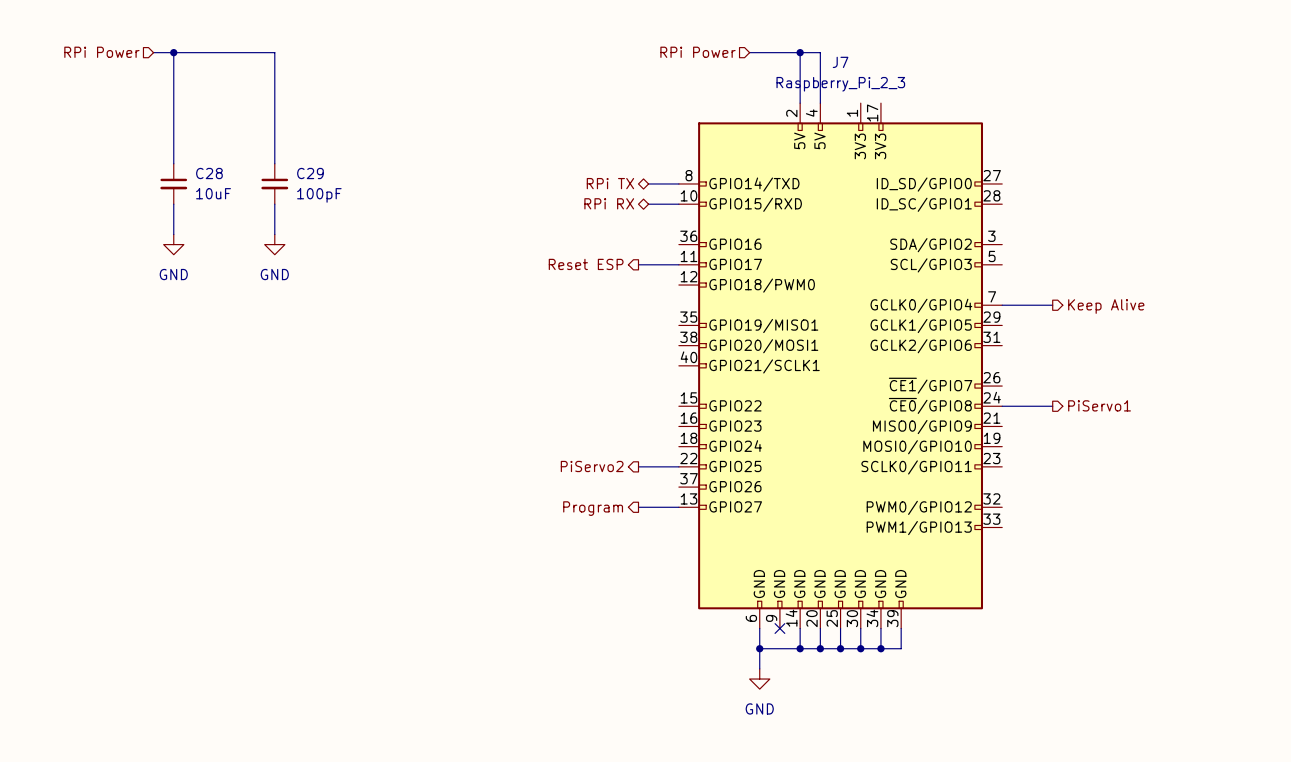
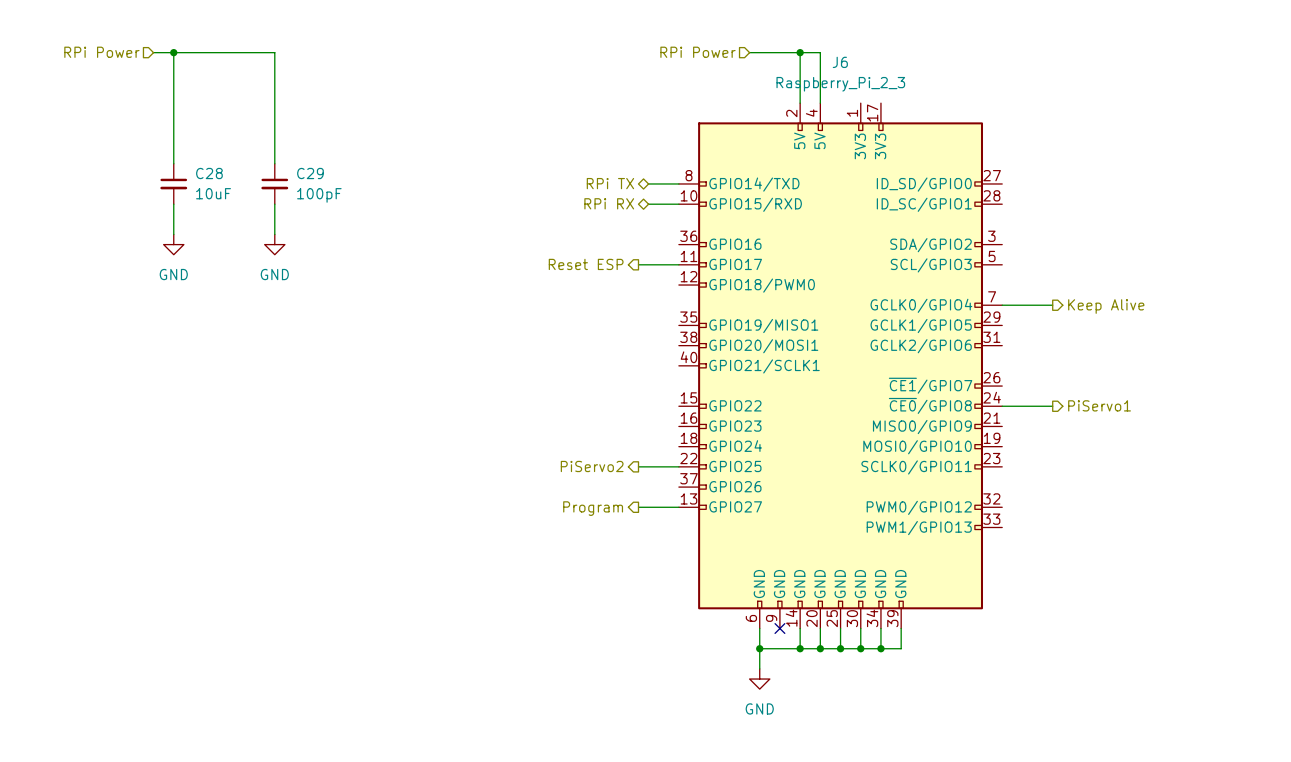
J7 name: J7 (840, 62) -> J6 (840, 62)

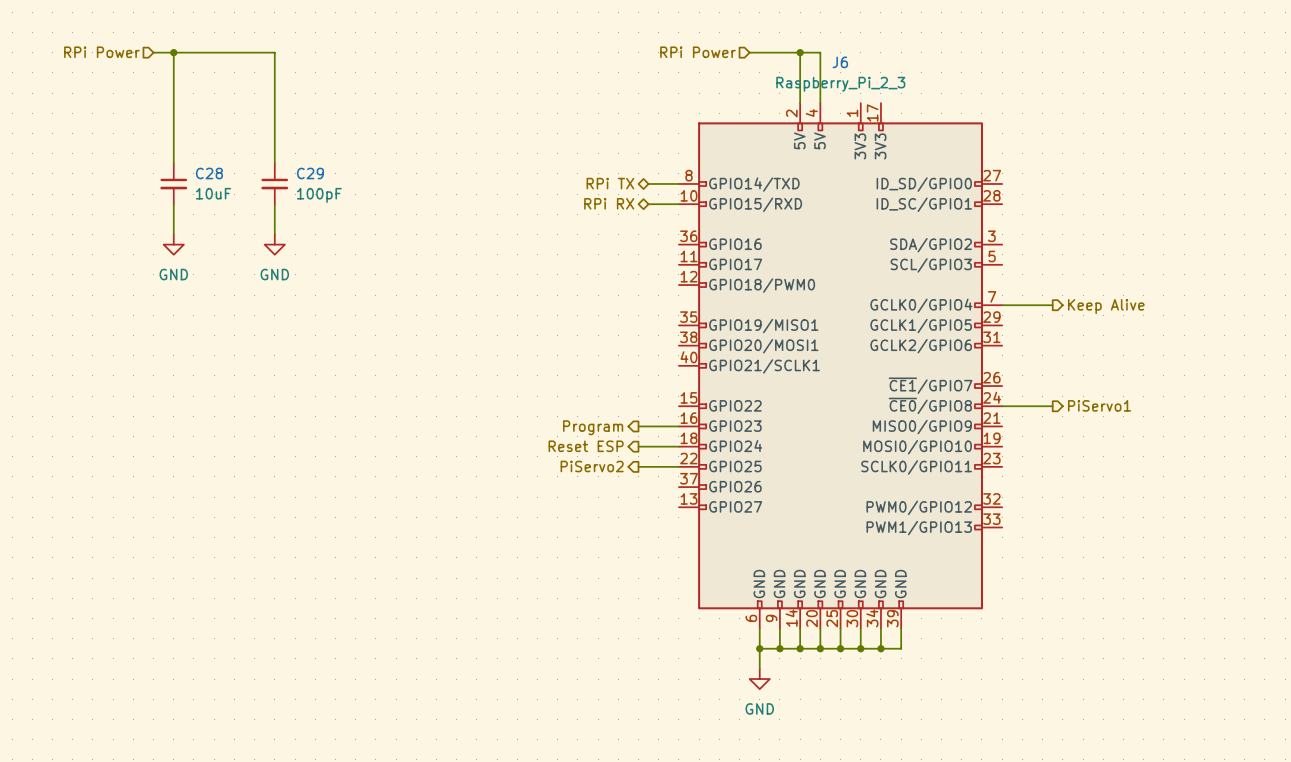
hierarchical label position: Reset ESP (586, 264) -> Reset ESP (586, 446)
wire: (638, 264) (678, 264) -> (638, 426) (678, 426)
wire: (638, 507) (678, 507) -> (638, 446) (678, 446)
hierarchical label position: Program (593, 508) -> Program (593, 427)
wire: none -> (779, 628) (779, 648)
no-connect mark: (779, 628) -> none
junction: none -> (779, 648)

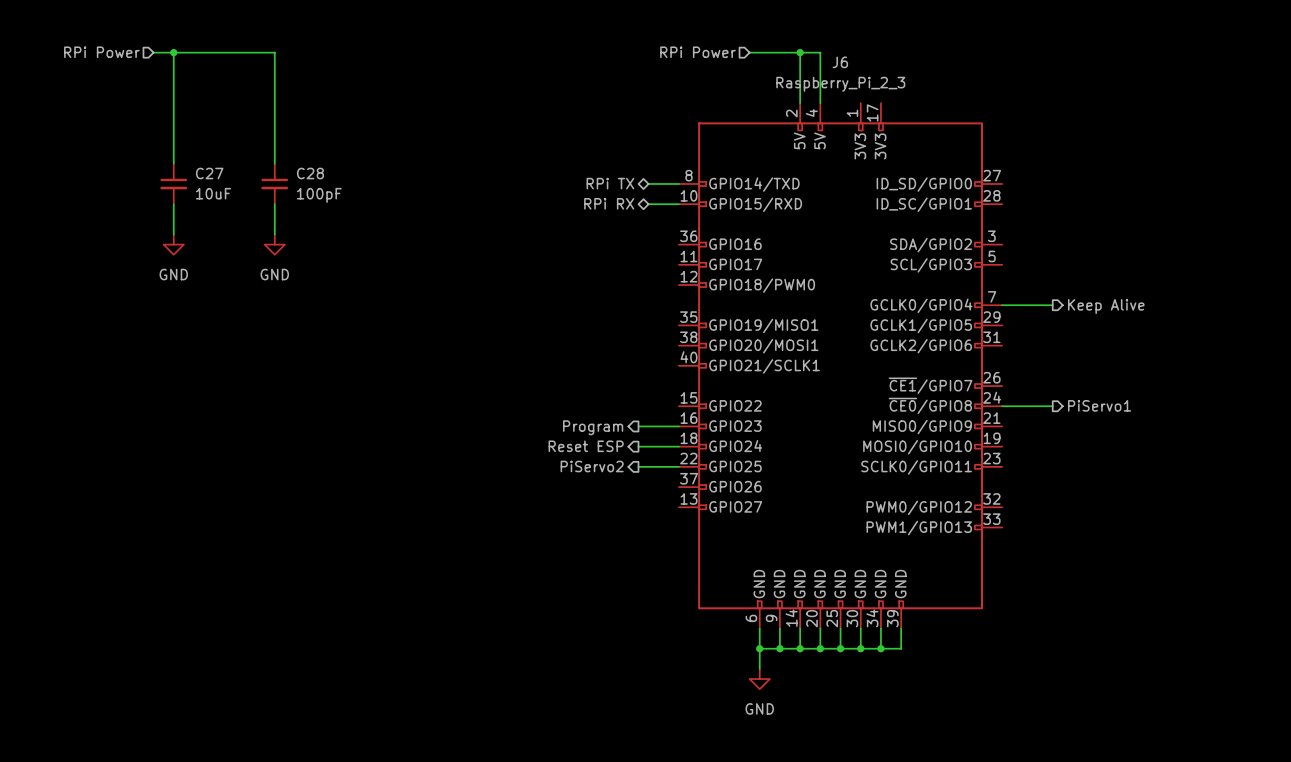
C28 name: C28 (209, 173) -> C27 (209, 173)
C29 name: C29 (310, 173) -> C28 (310, 173)

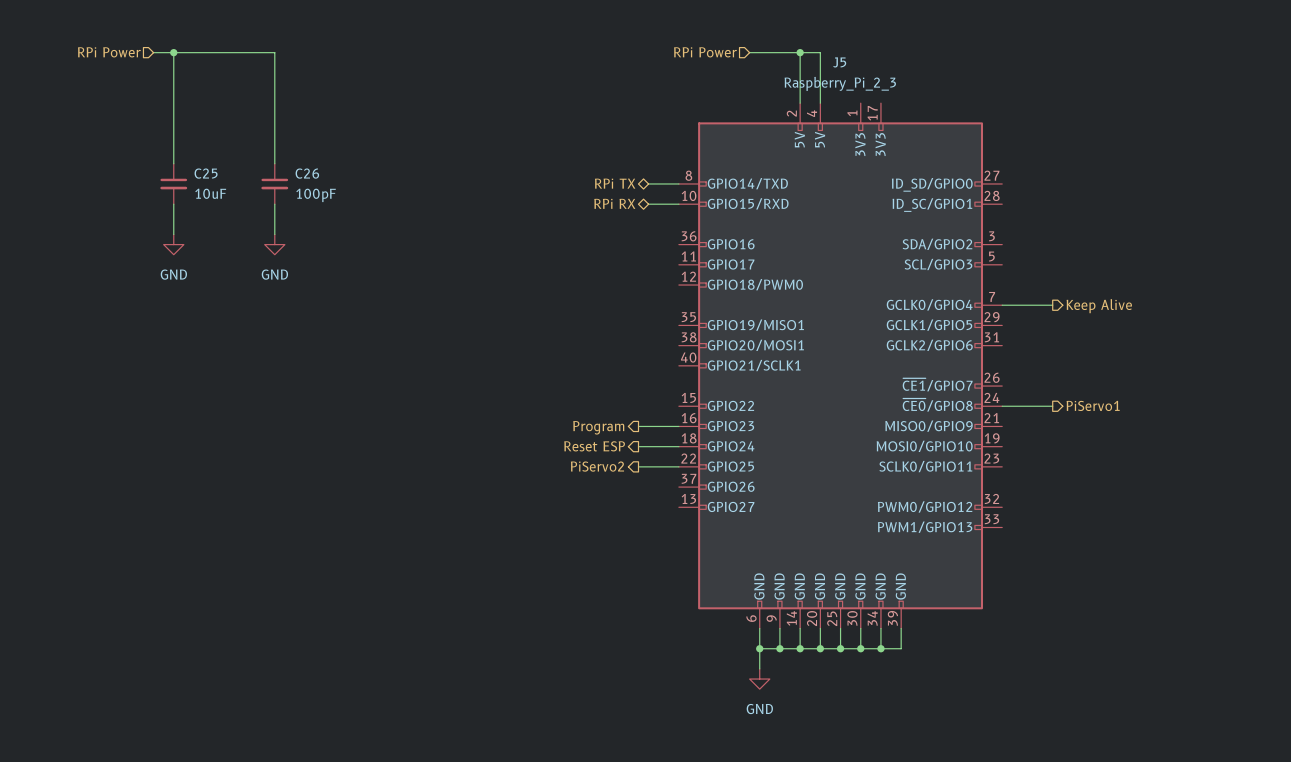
J6 name: J6 (840, 62) -> J5 (839, 62)
C27 name: C27 (209, 173) -> C25 (206, 173)
C28 name: C28 (310, 173) -> C26 (307, 173)

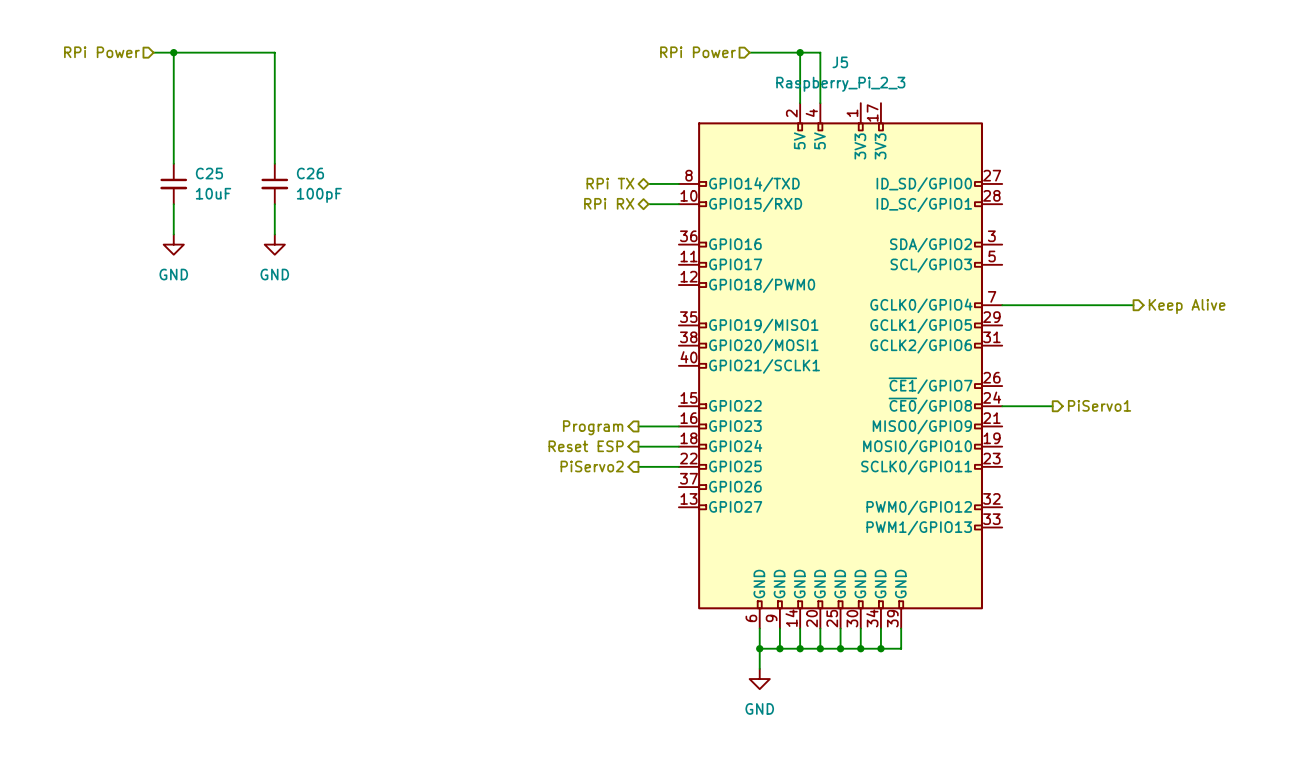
wire: none -> (1052, 305) (1133, 305)
hierarchical label position: Keep Alive (1099, 306) -> Keep Alive (1187, 306)

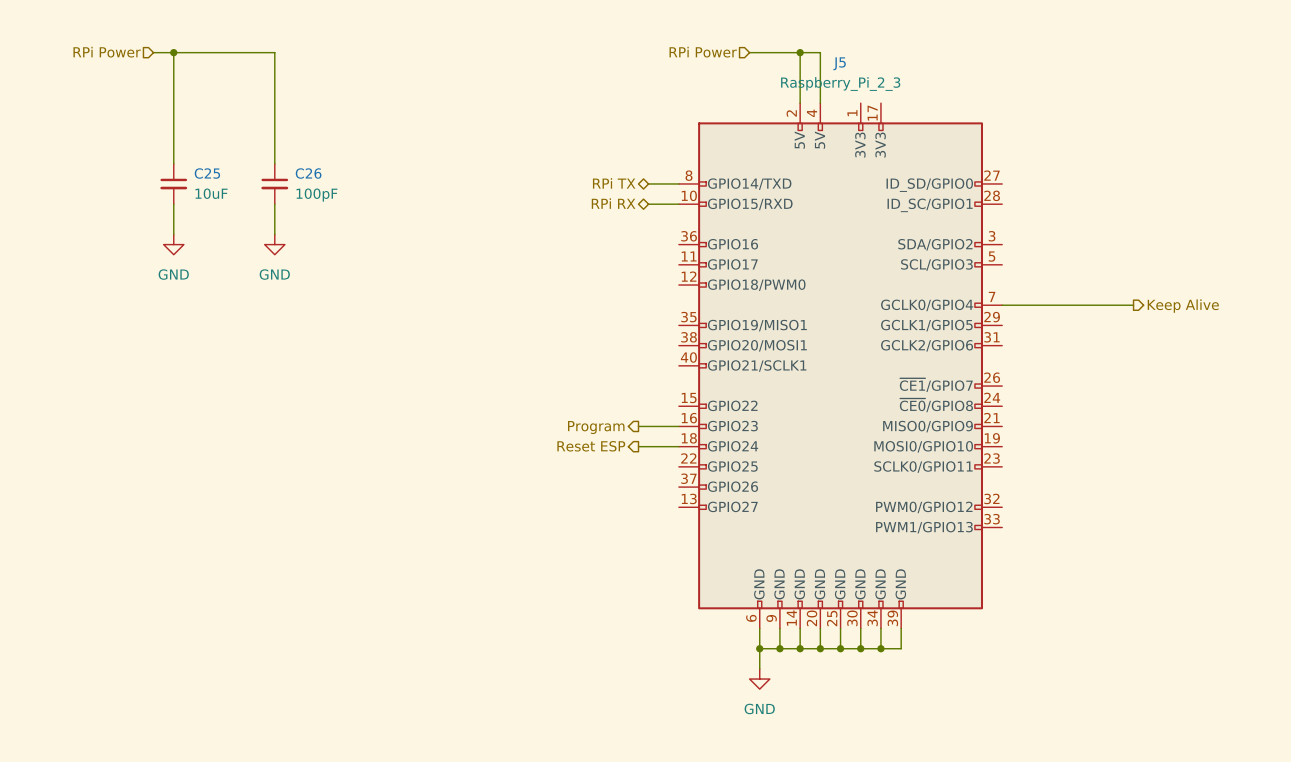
hierarchical label: PiServo1 (1099, 405) -> none
wire: (1002, 406) (1052, 406) -> none
hierarchical label: PiServo2 (592, 466) -> none
wire: (638, 466) (678, 466) -> none

